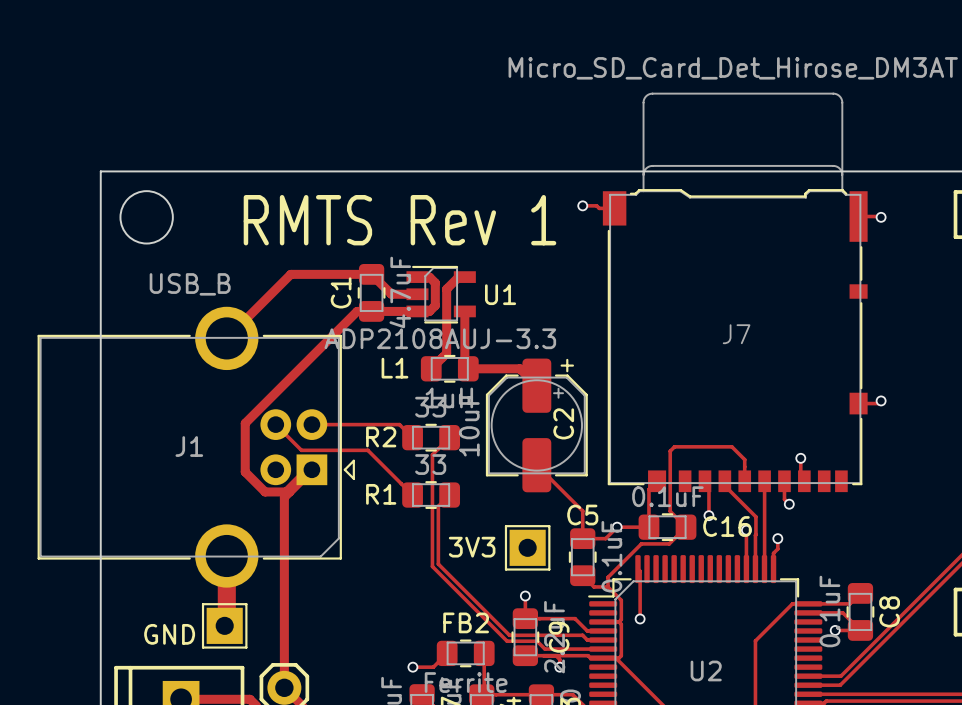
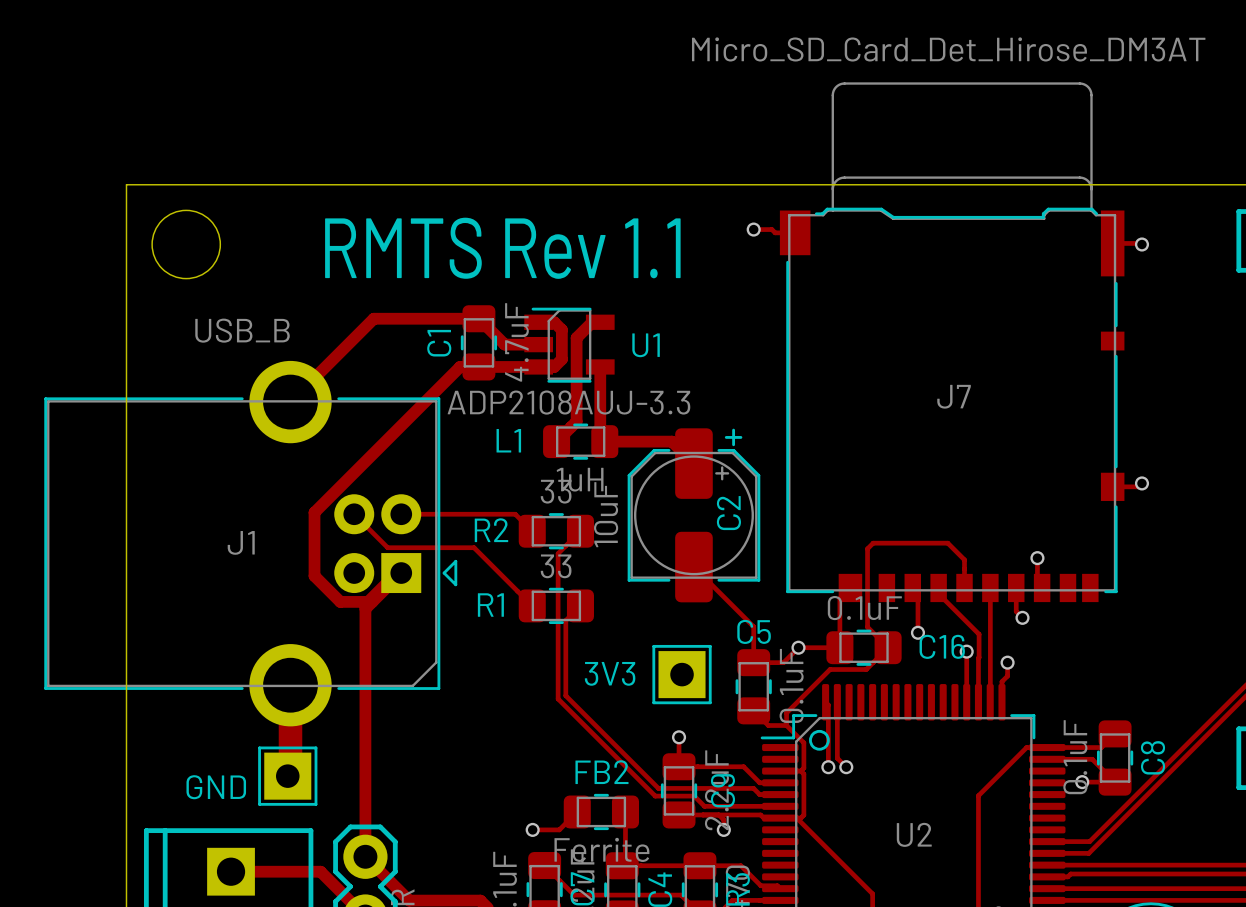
text: RMTS Rev 1 (399, 220) -> RMTS Rev 1.1 (502, 248)
track: none -> (837, 702) (837, 758) (846, 767)
drawing: none -> [809, 729, 830, 751]
via: none -> (846, 767)

